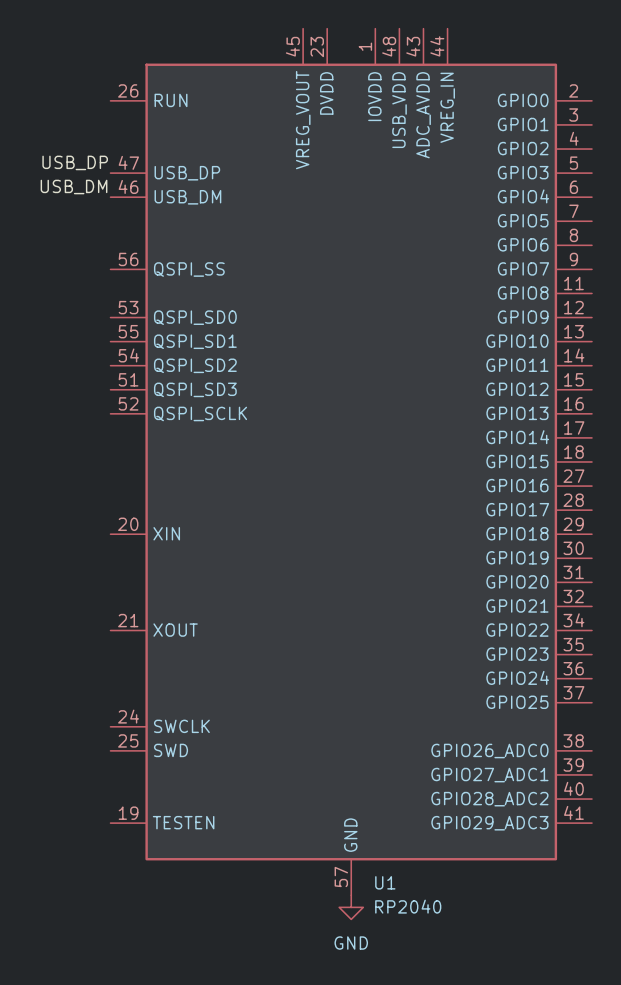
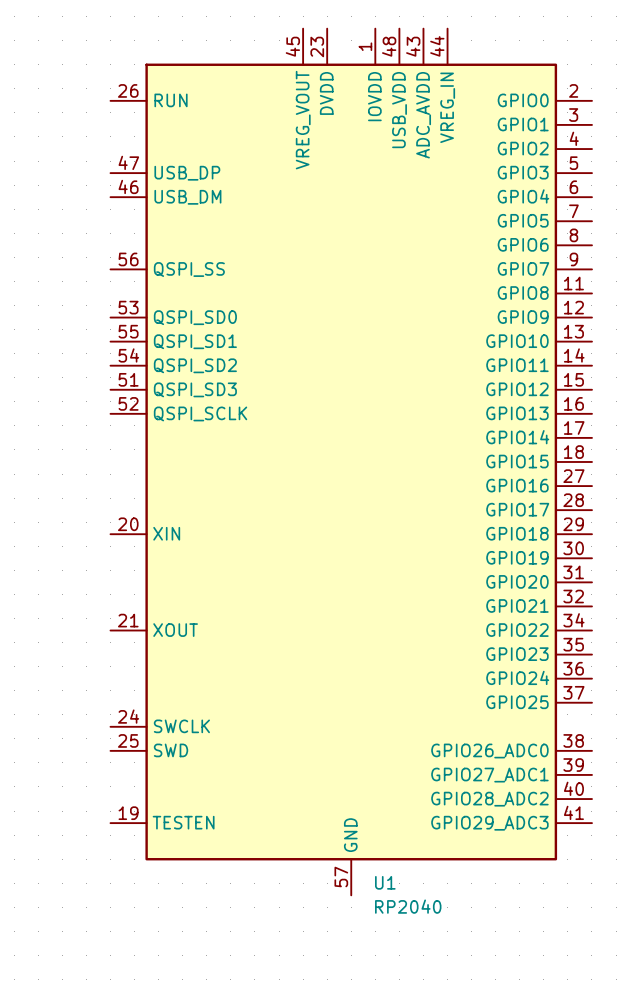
label: USB_DP (75, 162) -> none
label: USB_DM (74, 187) -> none
power symbol: GND (351, 907) -> none

